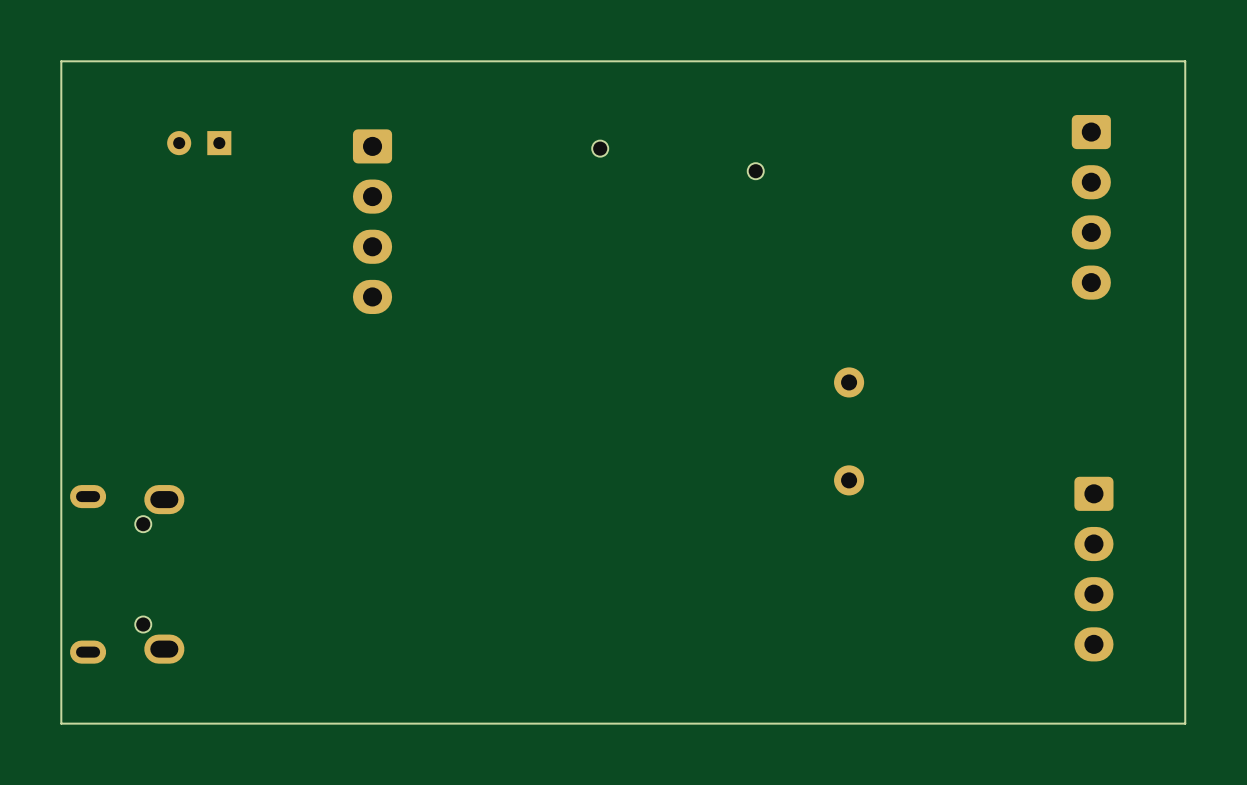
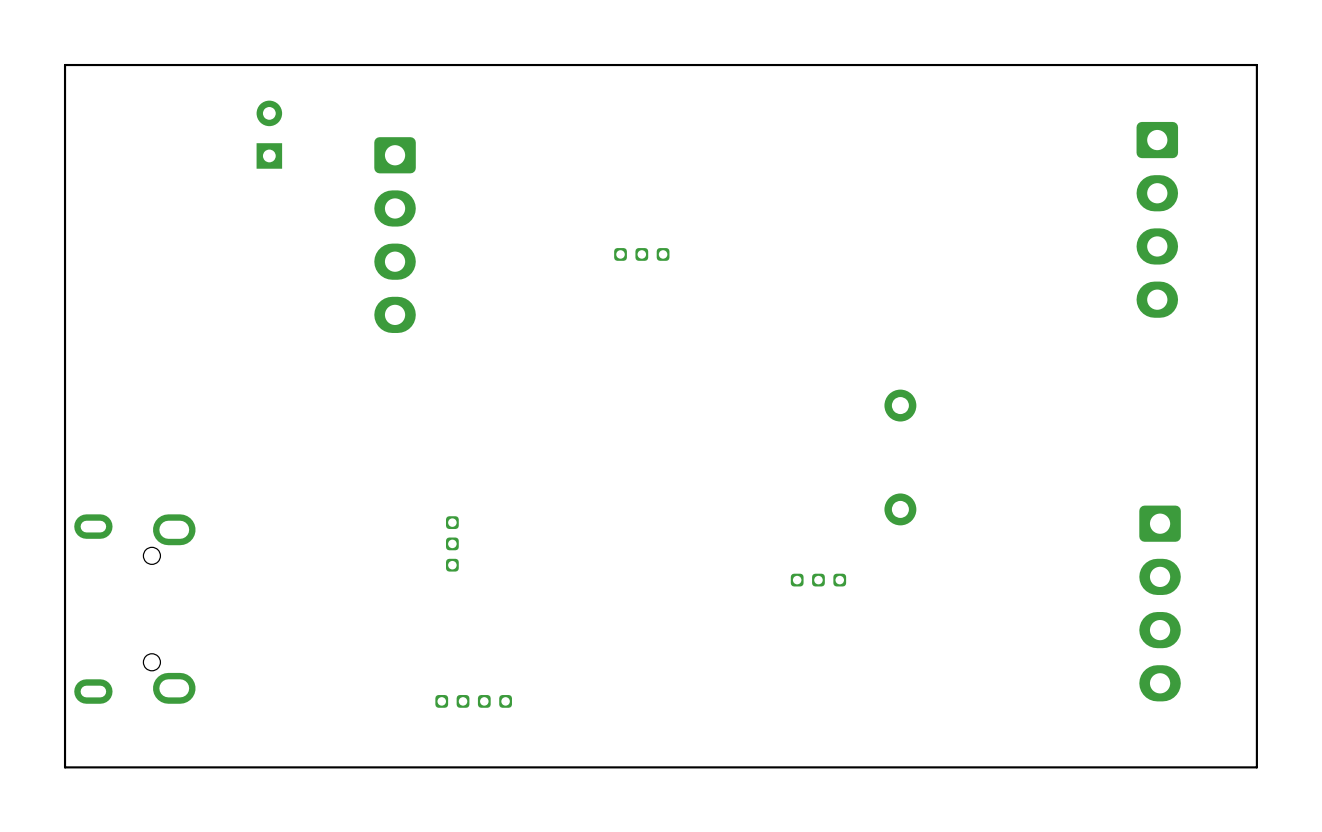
part rotation: 0° (199, 143) -> 90° clockwise (269, 134)
part position: (199, 143) -> (269, 134)
part: (600, 148) -> none
part: (755, 171) -> none
part: none -> (641, 254)
part: none -> (452, 543)
part: none -> (818, 580)
part: none -> (473, 701)

